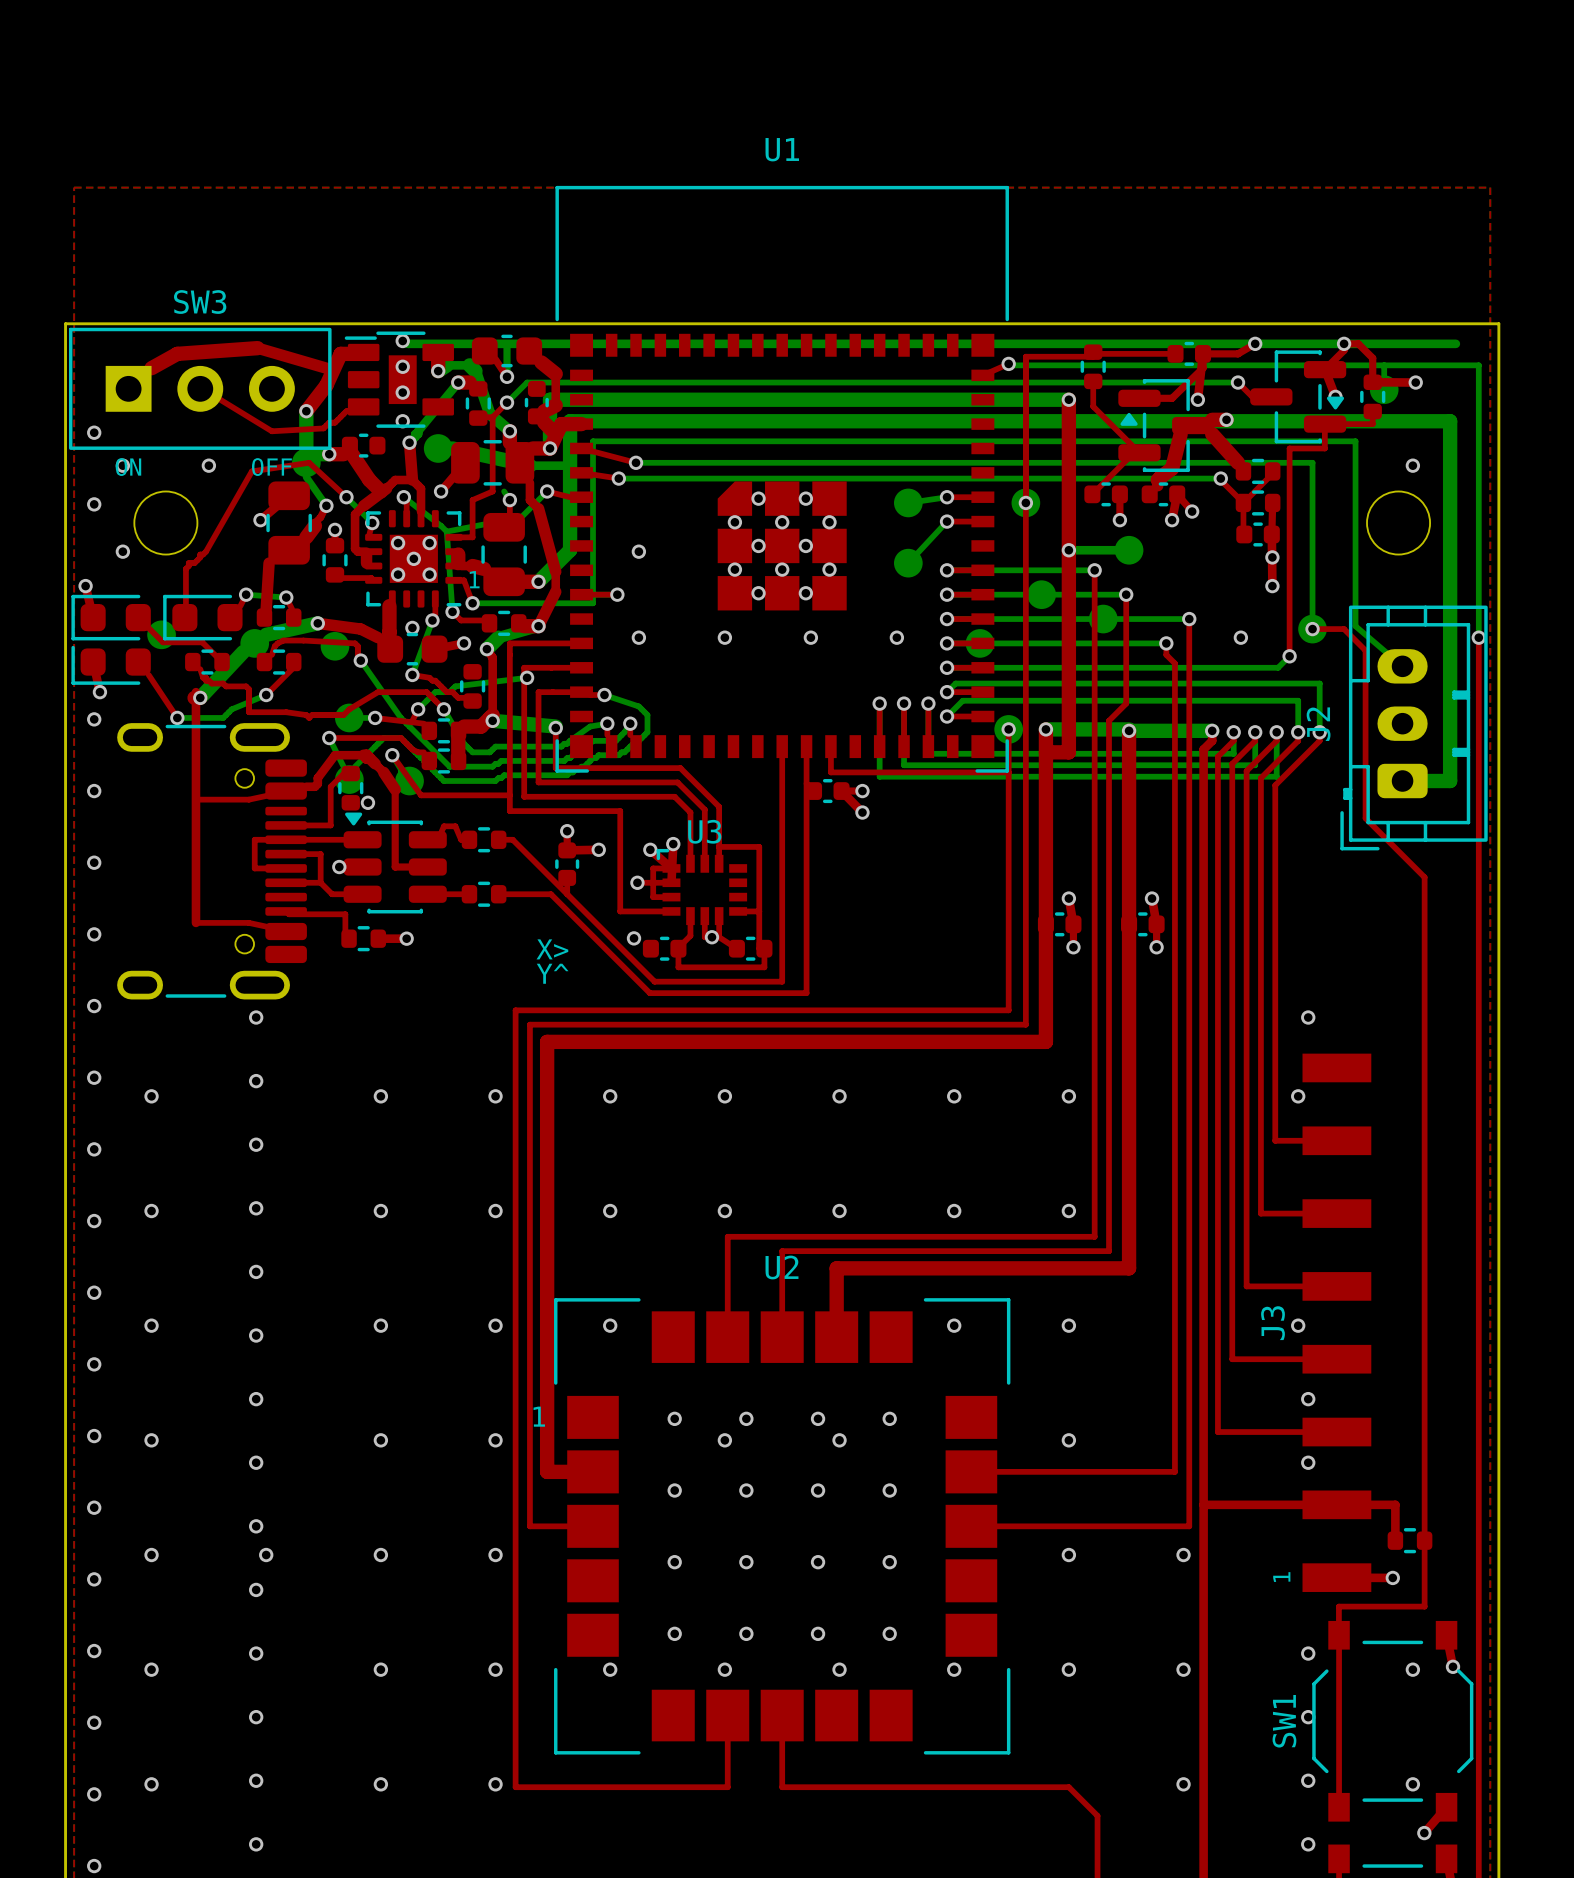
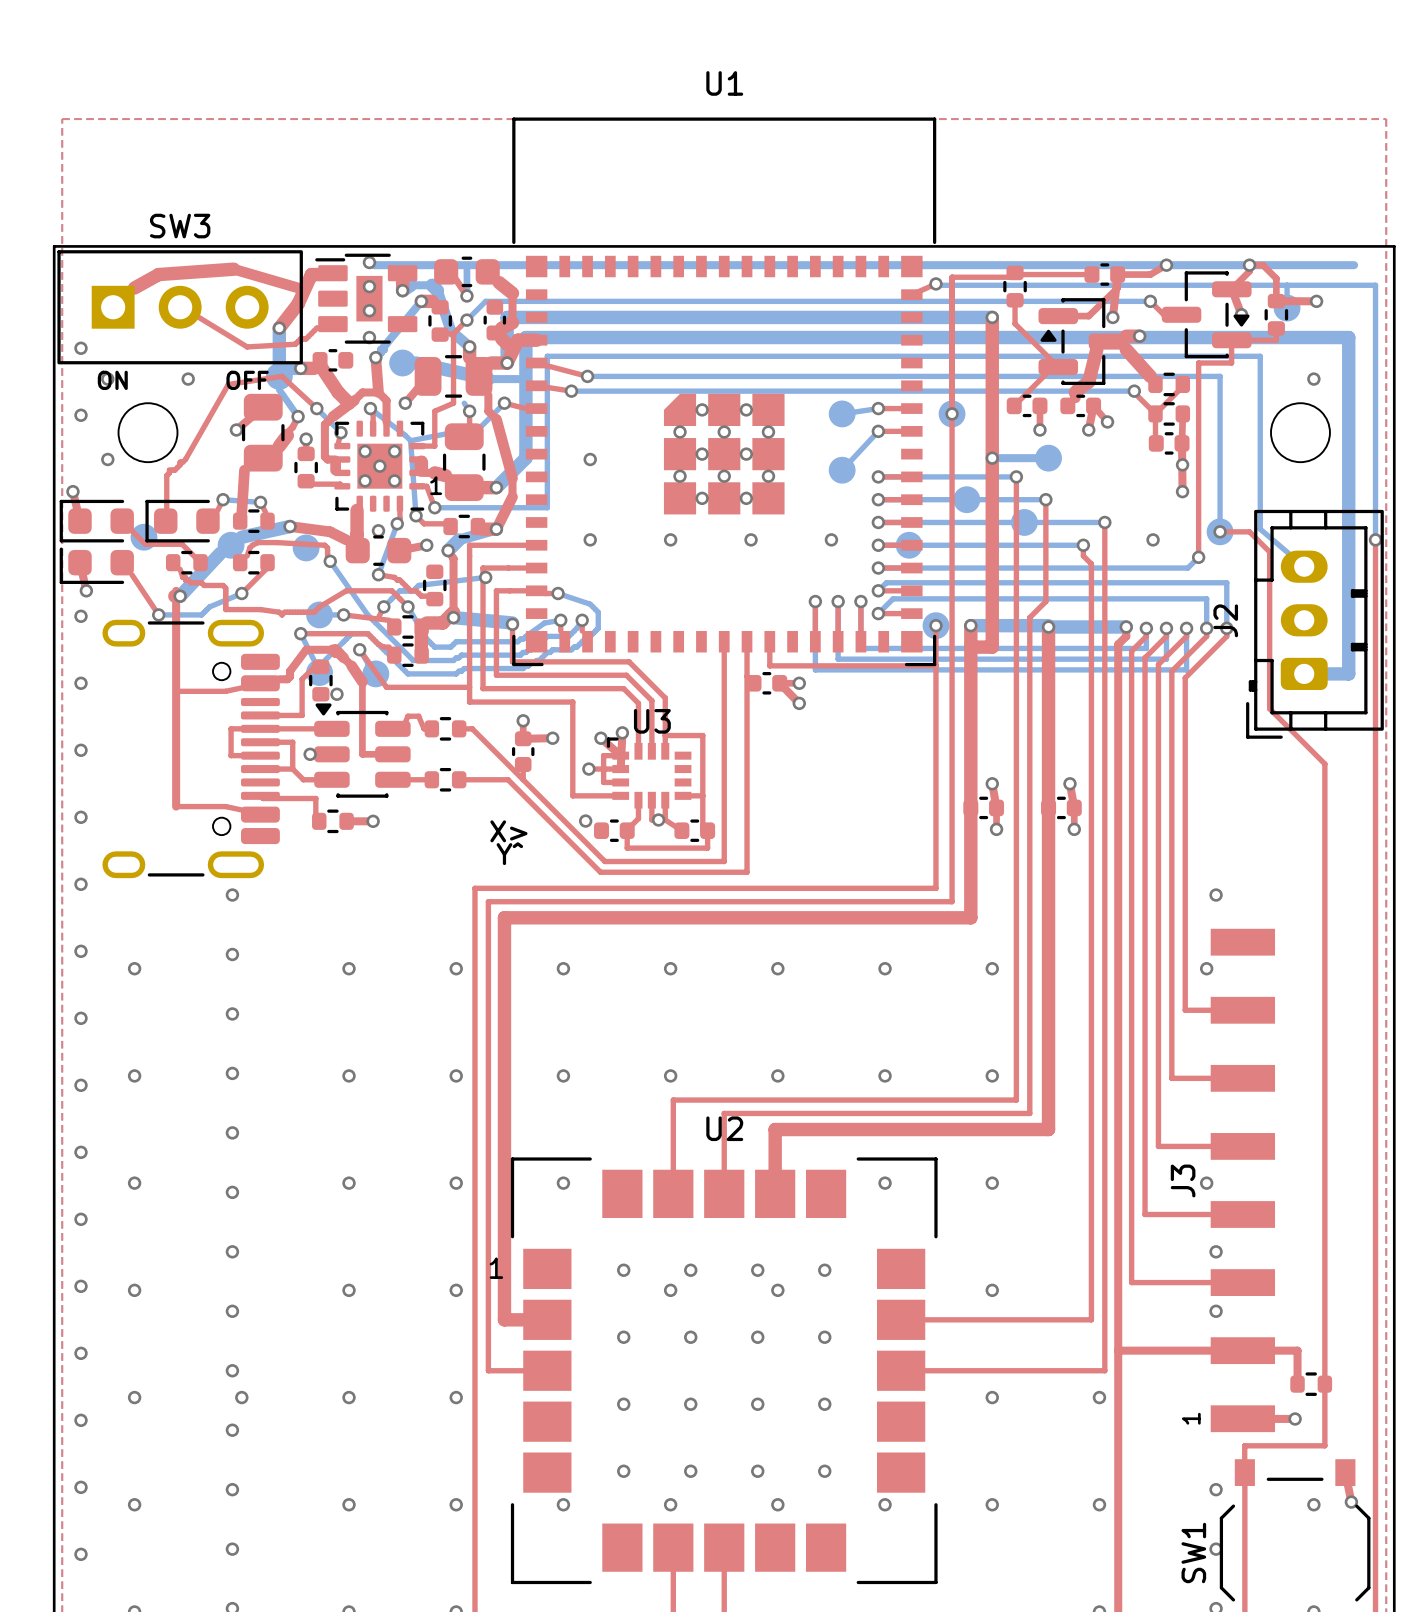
top track: (581, 594) (617, 594) -> none
via: (617, 594) -> none

